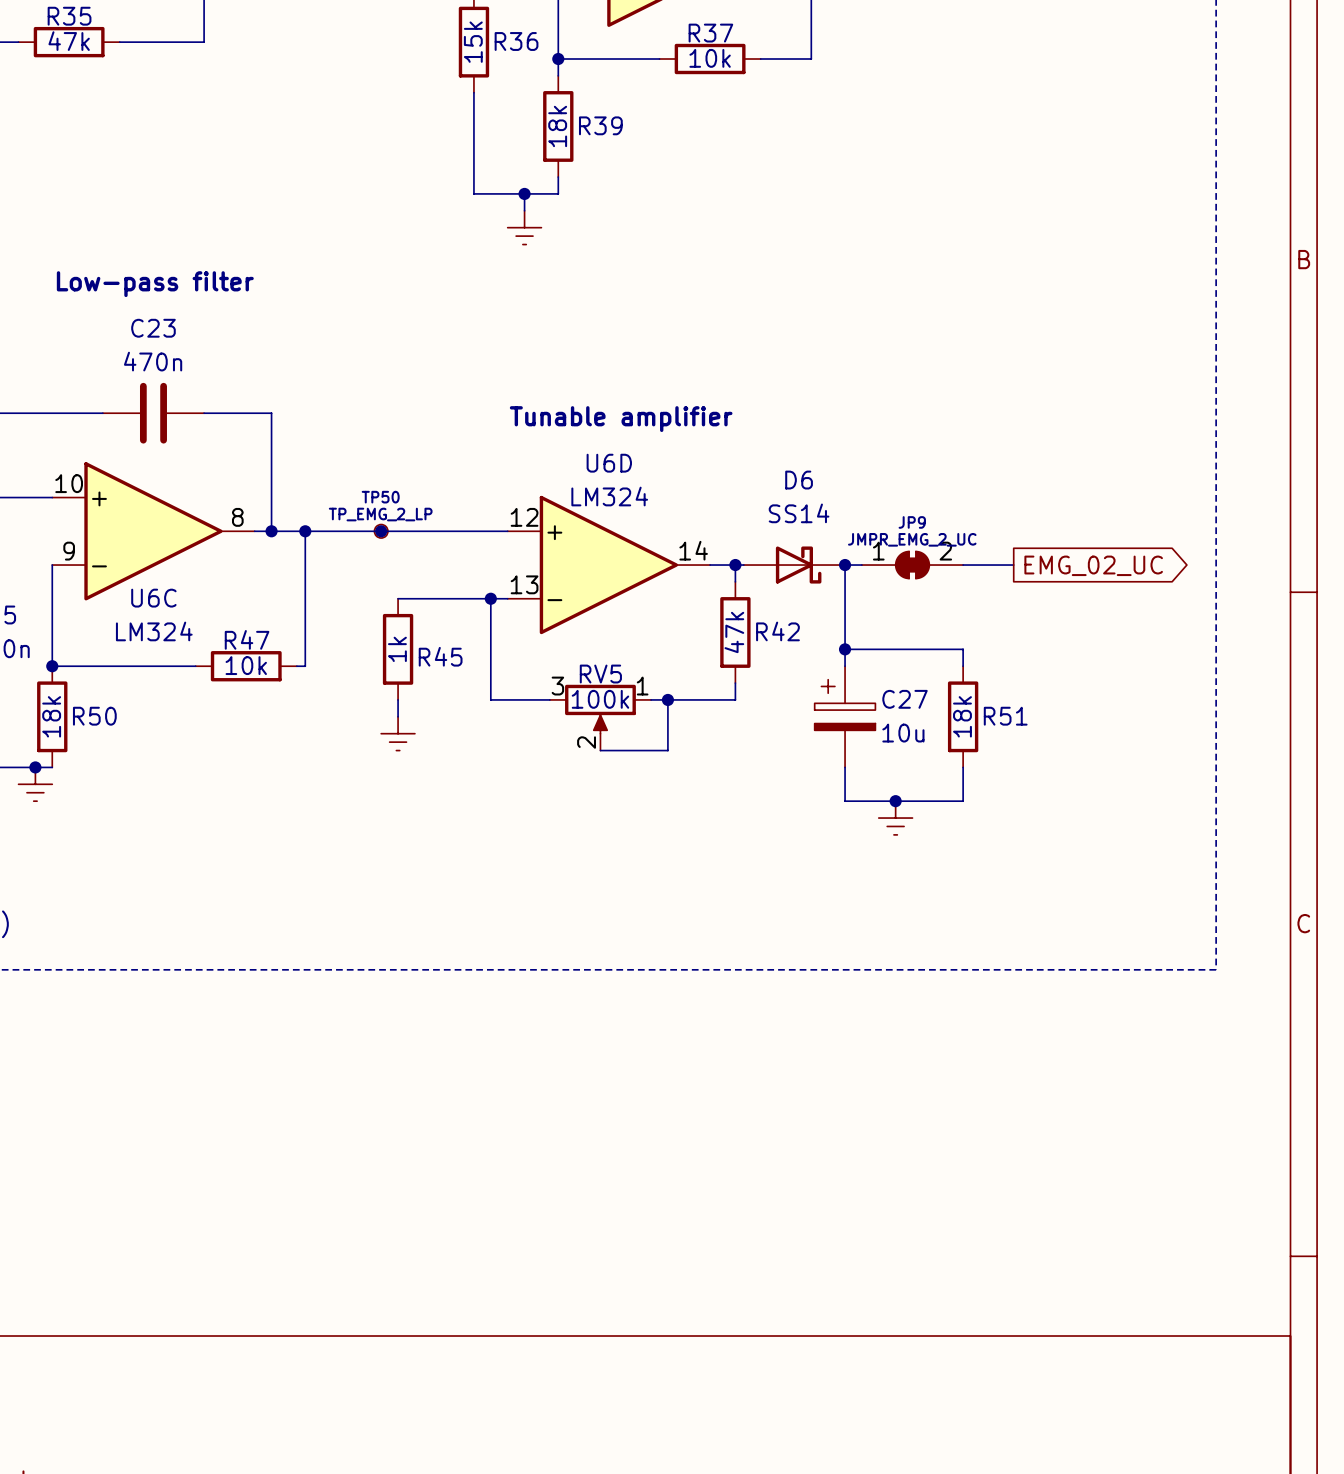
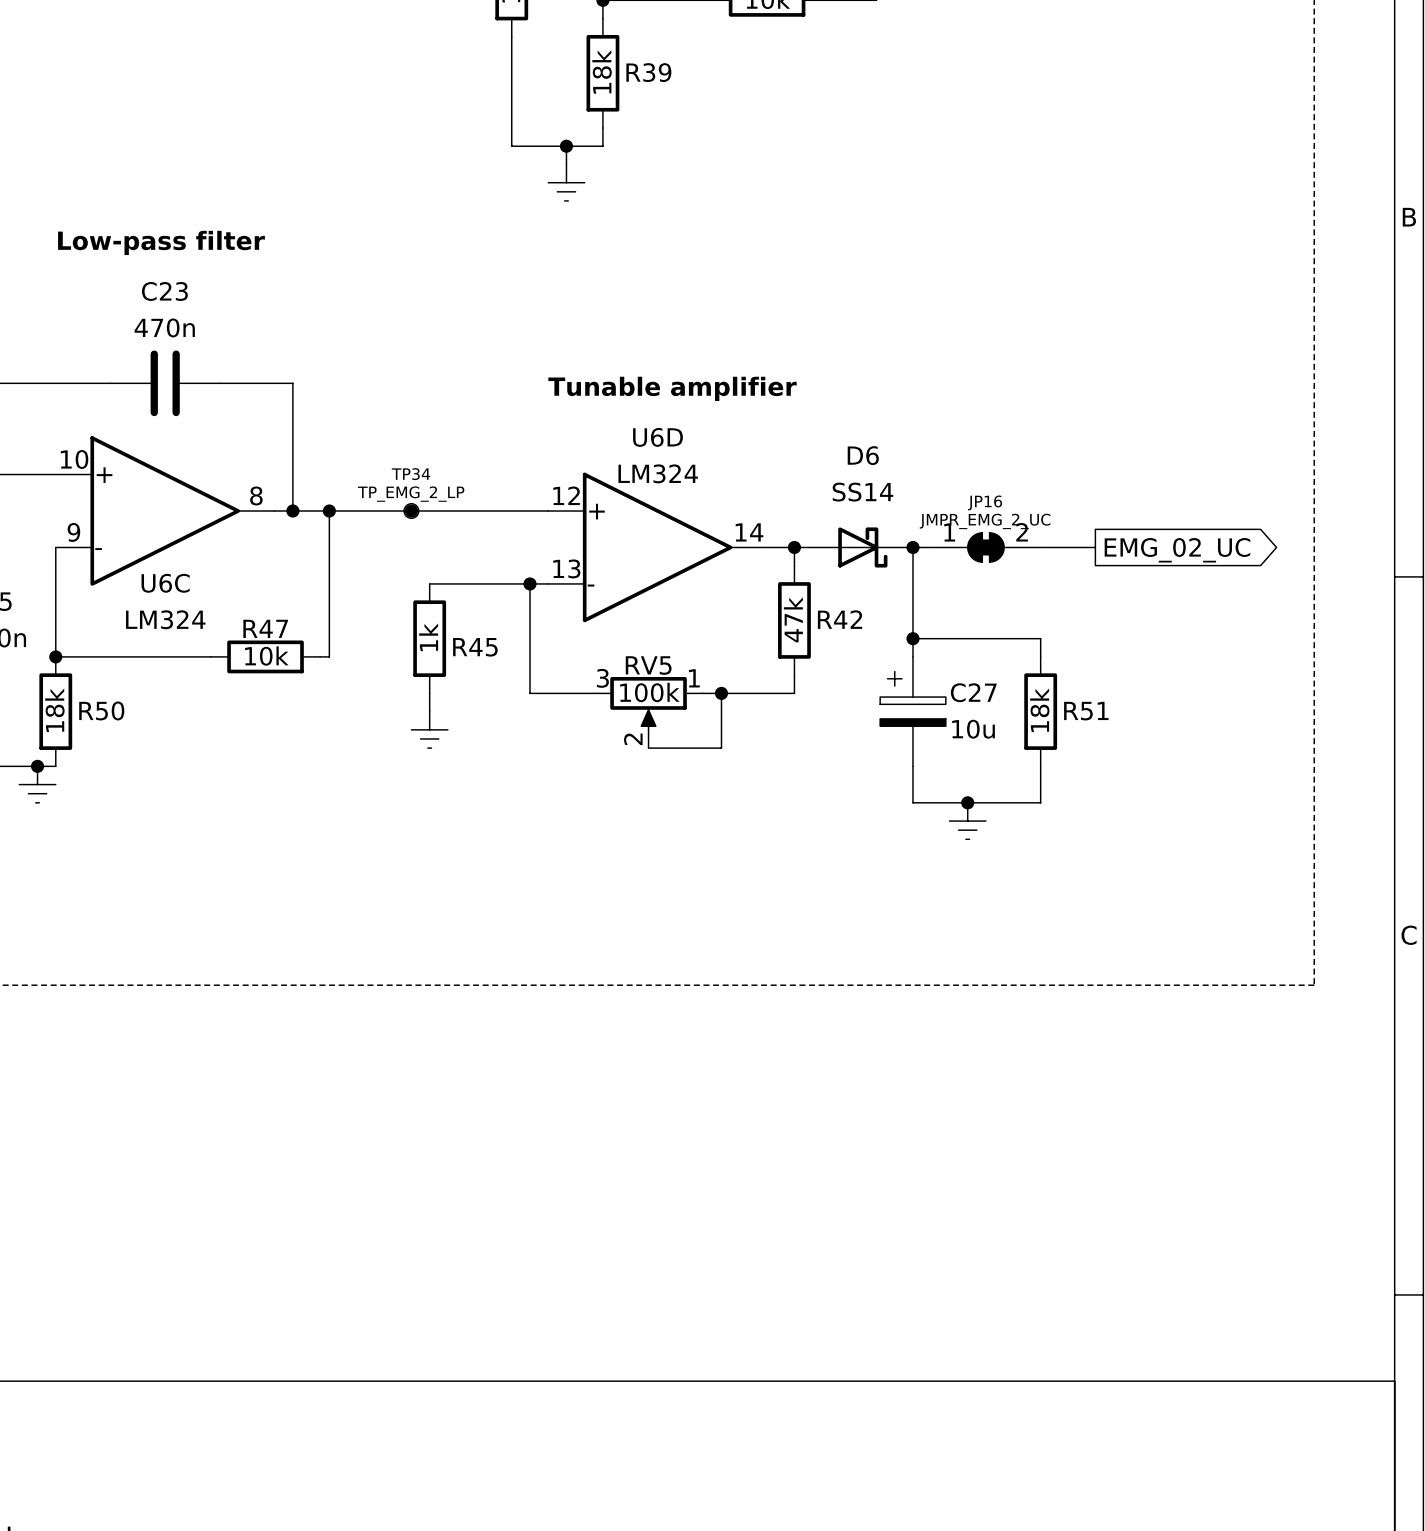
TP50 name: TP50 (380, 497) -> TP34 (410, 474)
JP9 name: JP9 (912, 522) -> JP16 (985, 502)

